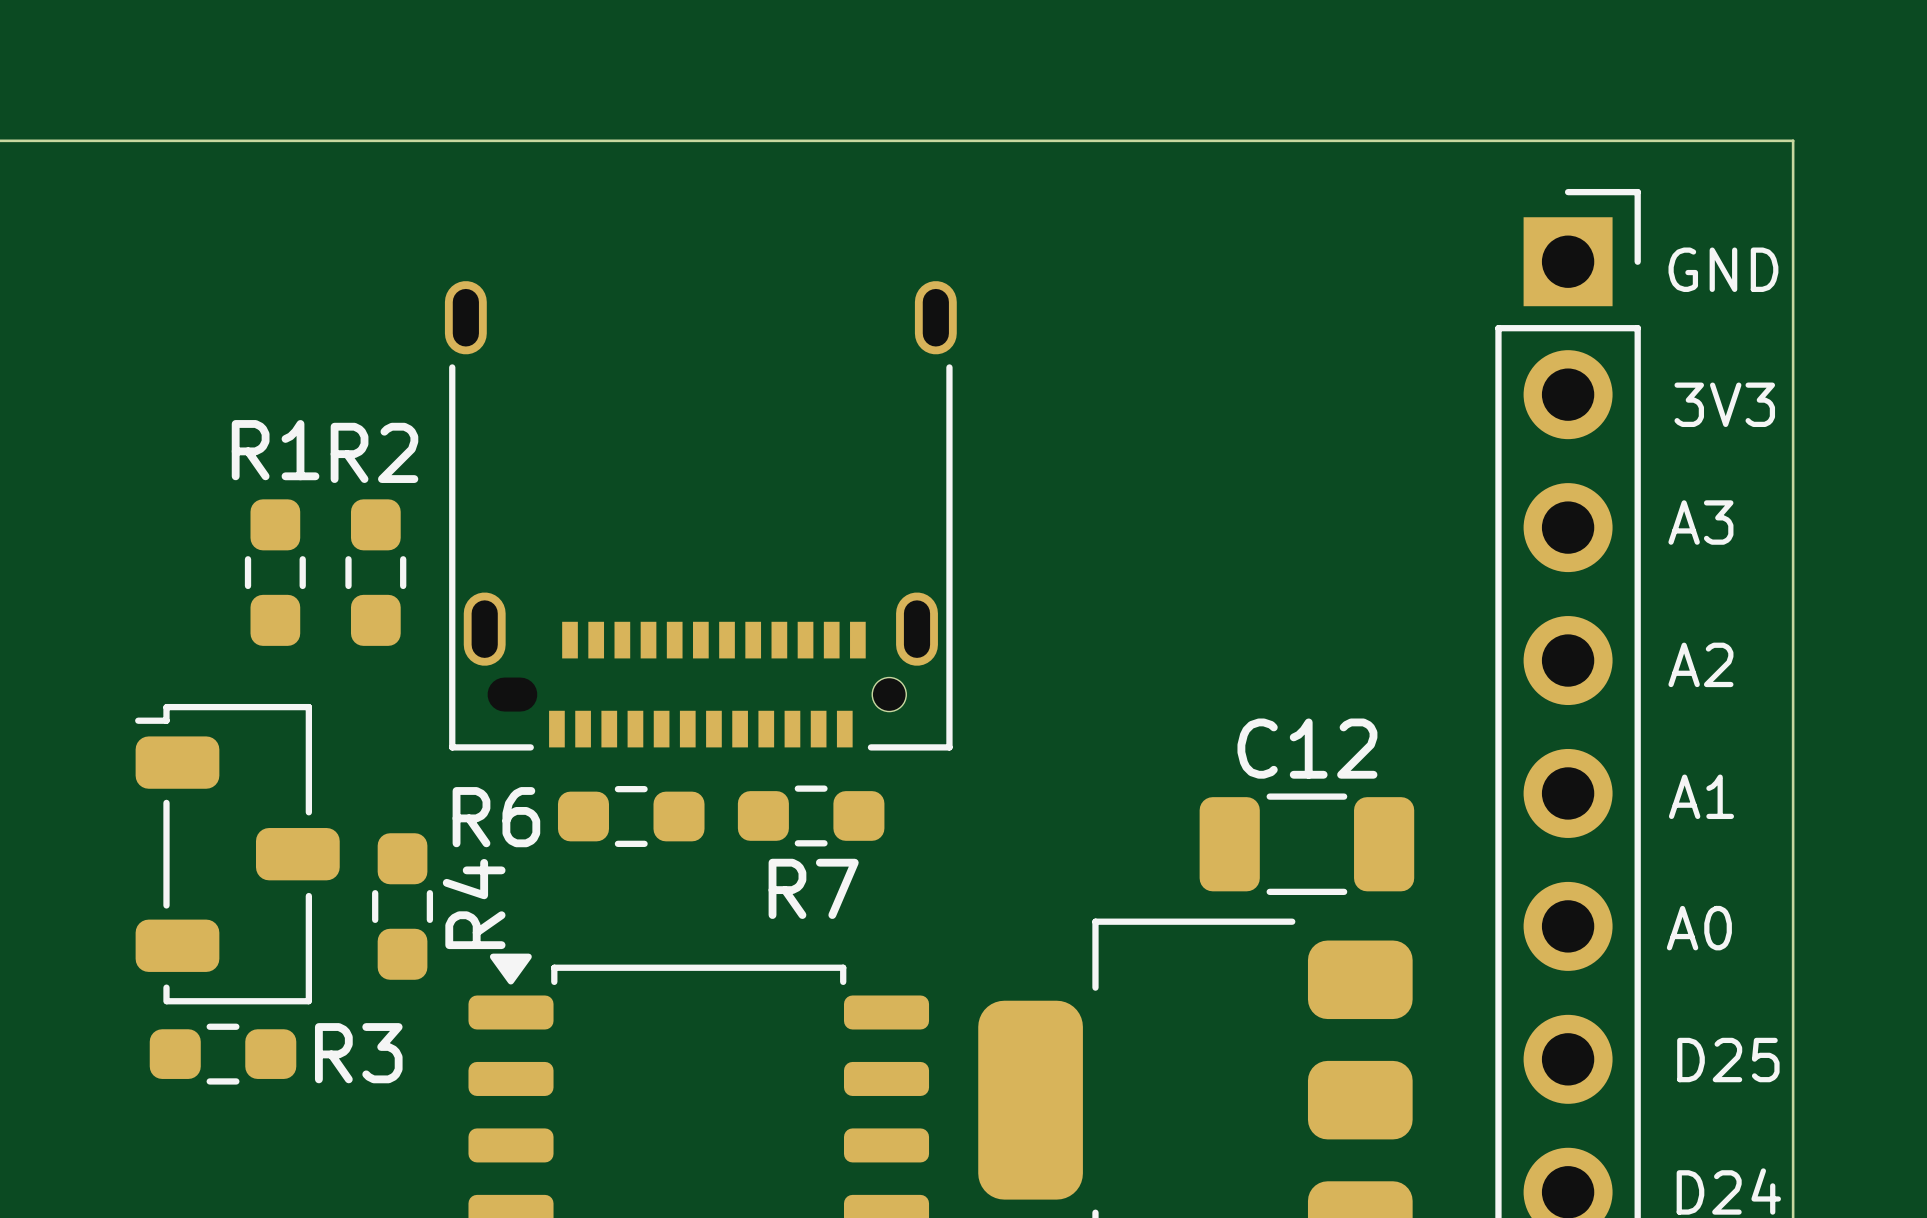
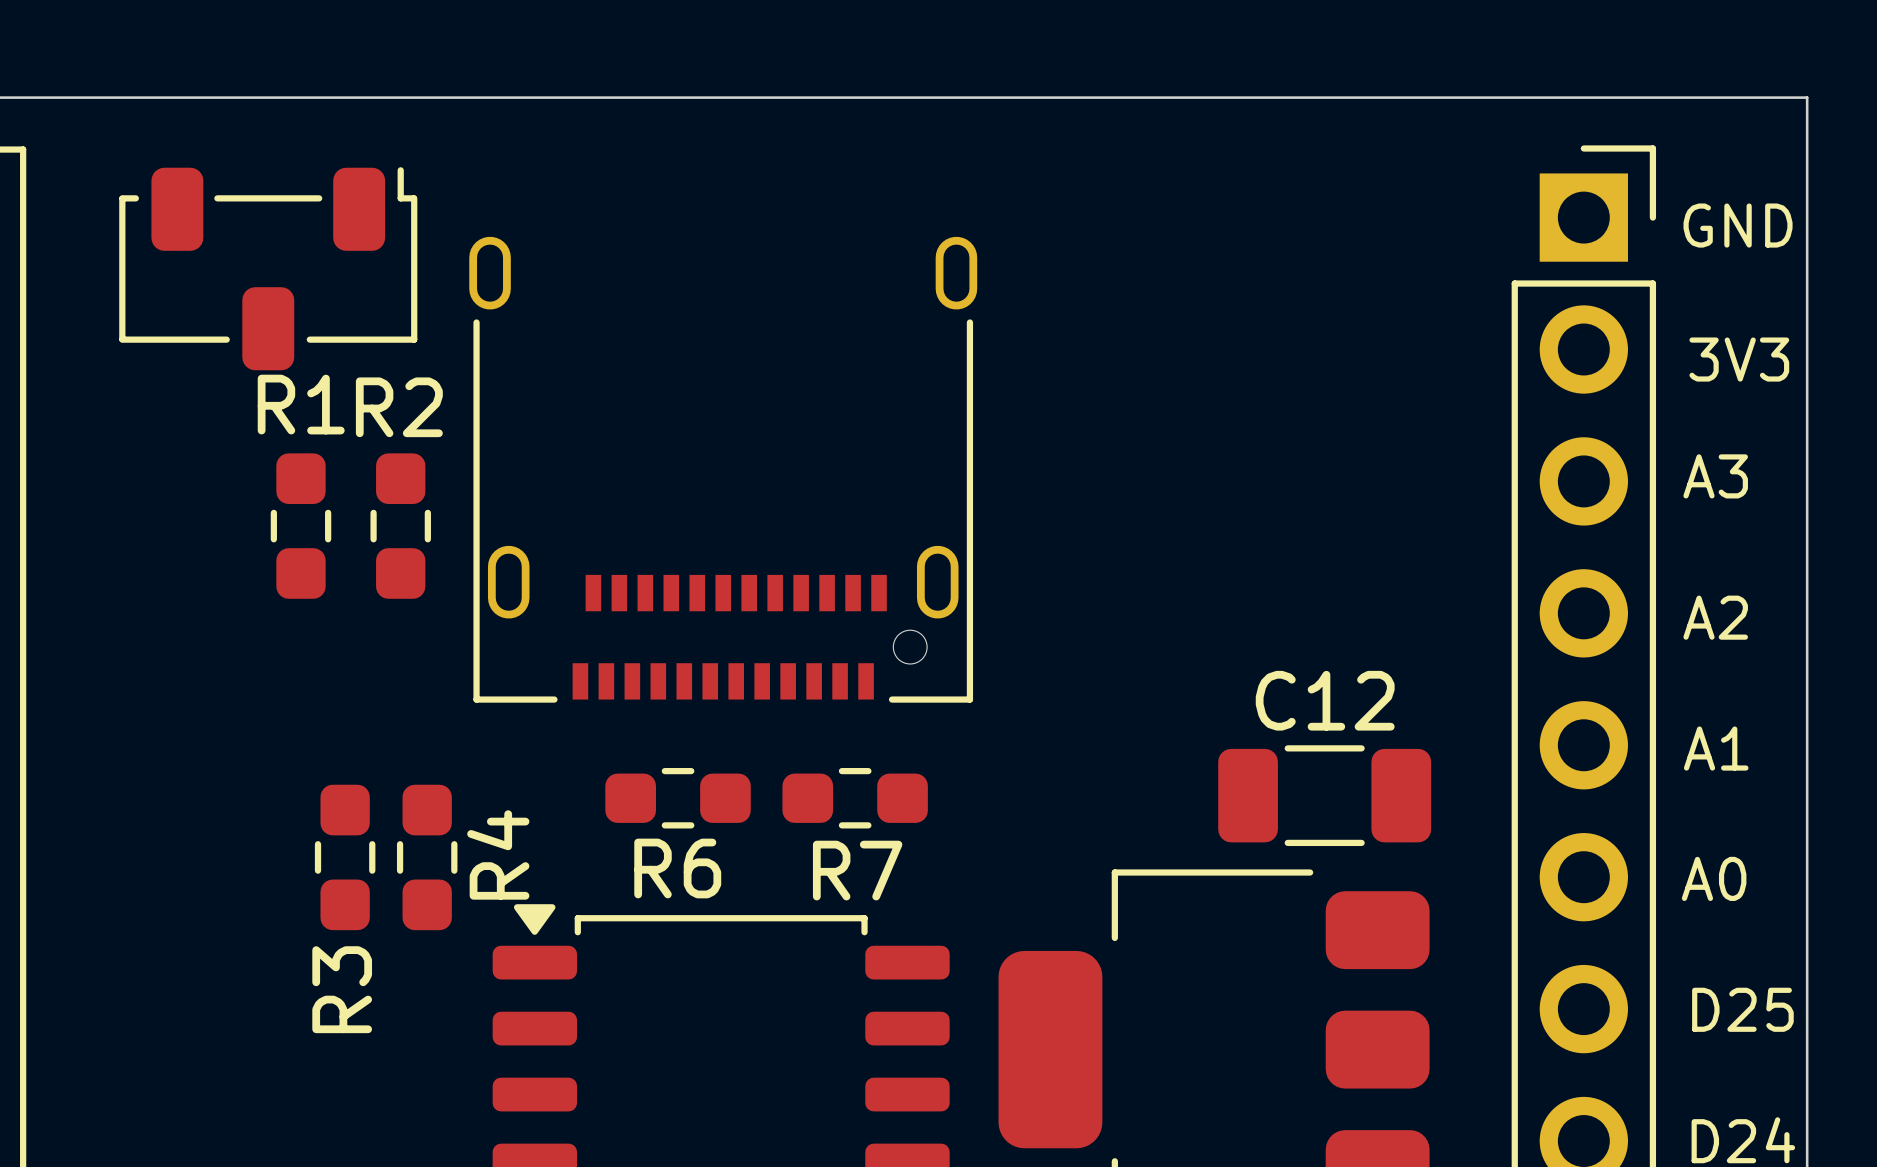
R7 position: (811, 815) -> (855, 798)
R6 position: (631, 816) -> (678, 798)
R6 name position: R6 (496, 817) -> R6 (677, 868)
part rotation: 0° (237, 854) -> 90° clockwise (268, 268)
part position: (237, 854) -> (268, 268)
R3 rotation: 0° (223, 1054) -> 90° clockwise (345, 857)
R3 position: (223, 1054) -> (345, 857)

